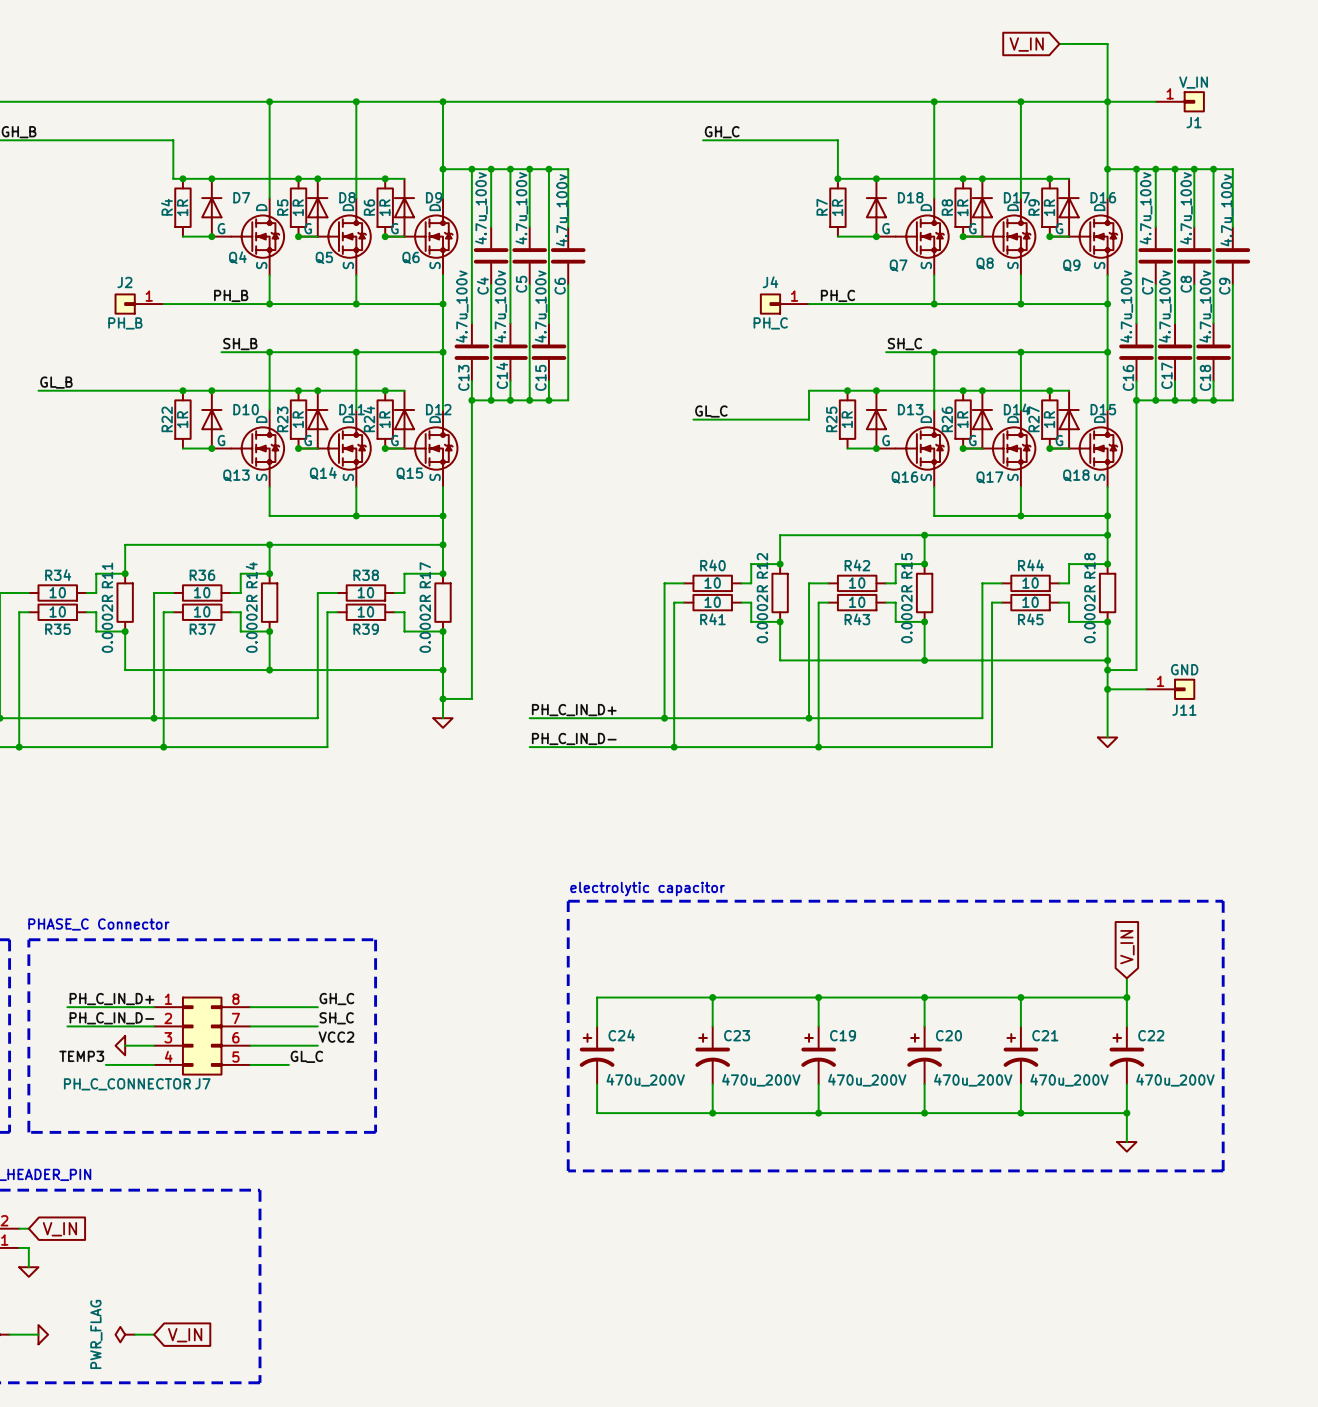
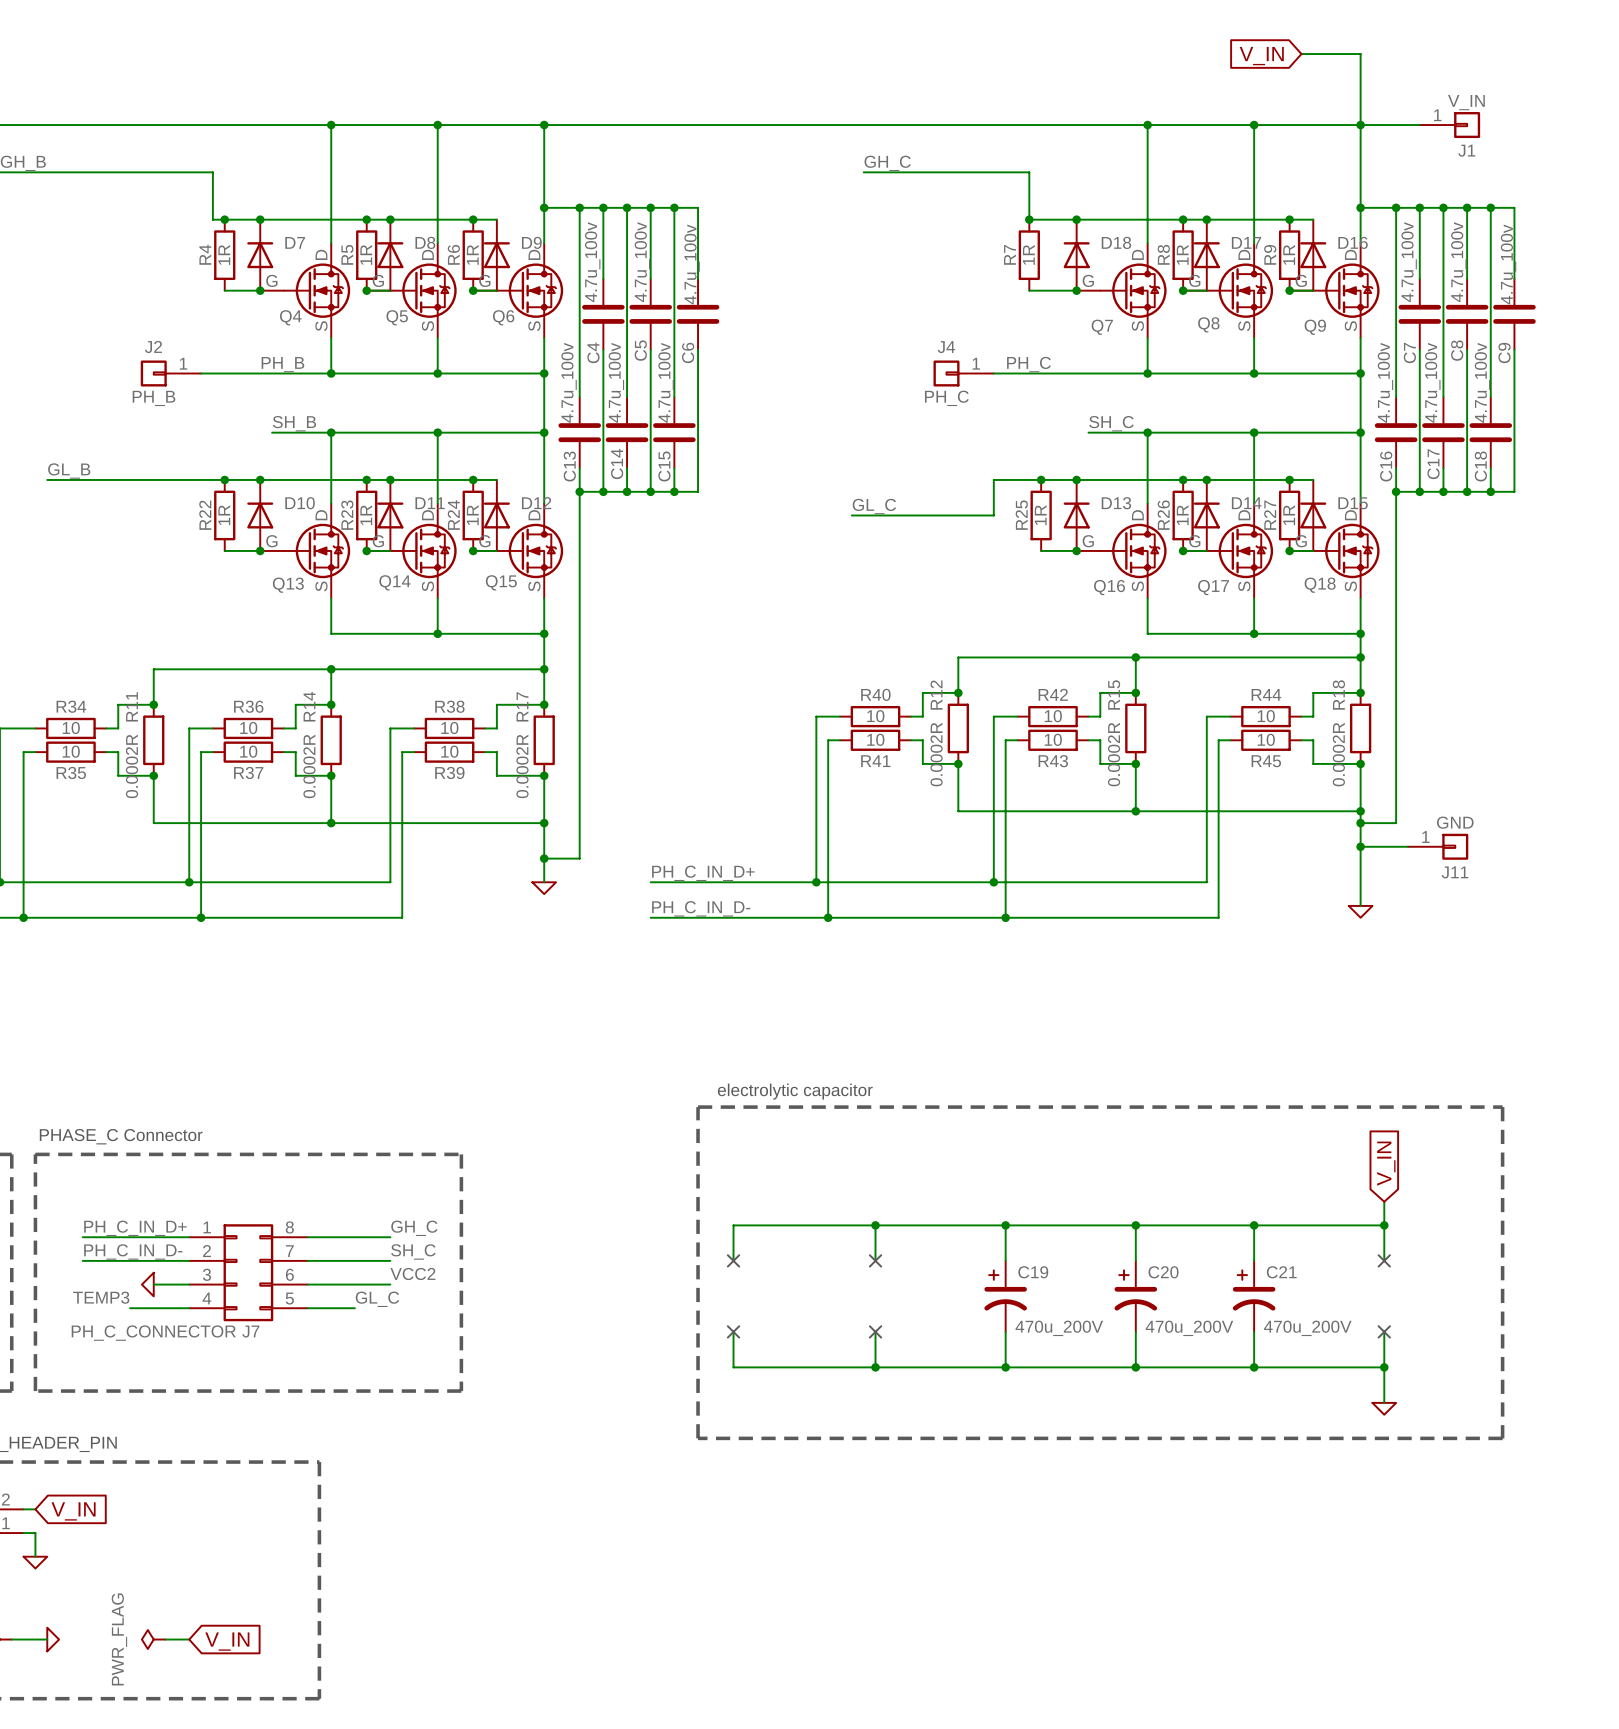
no-connect mark: none -> (733, 1260)
no-connect mark: none -> (875, 1260)
no-connect mark: none -> (1384, 1260)
C24: 470u_200V (597, 1055) -> none
C23: 470u_200V (712, 1055) -> none
C22: 470u_200V (1126, 1055) -> none
no-connect mark: none -> (733, 1331)
no-connect mark: none -> (875, 1331)
no-connect mark: none -> (1384, 1331)

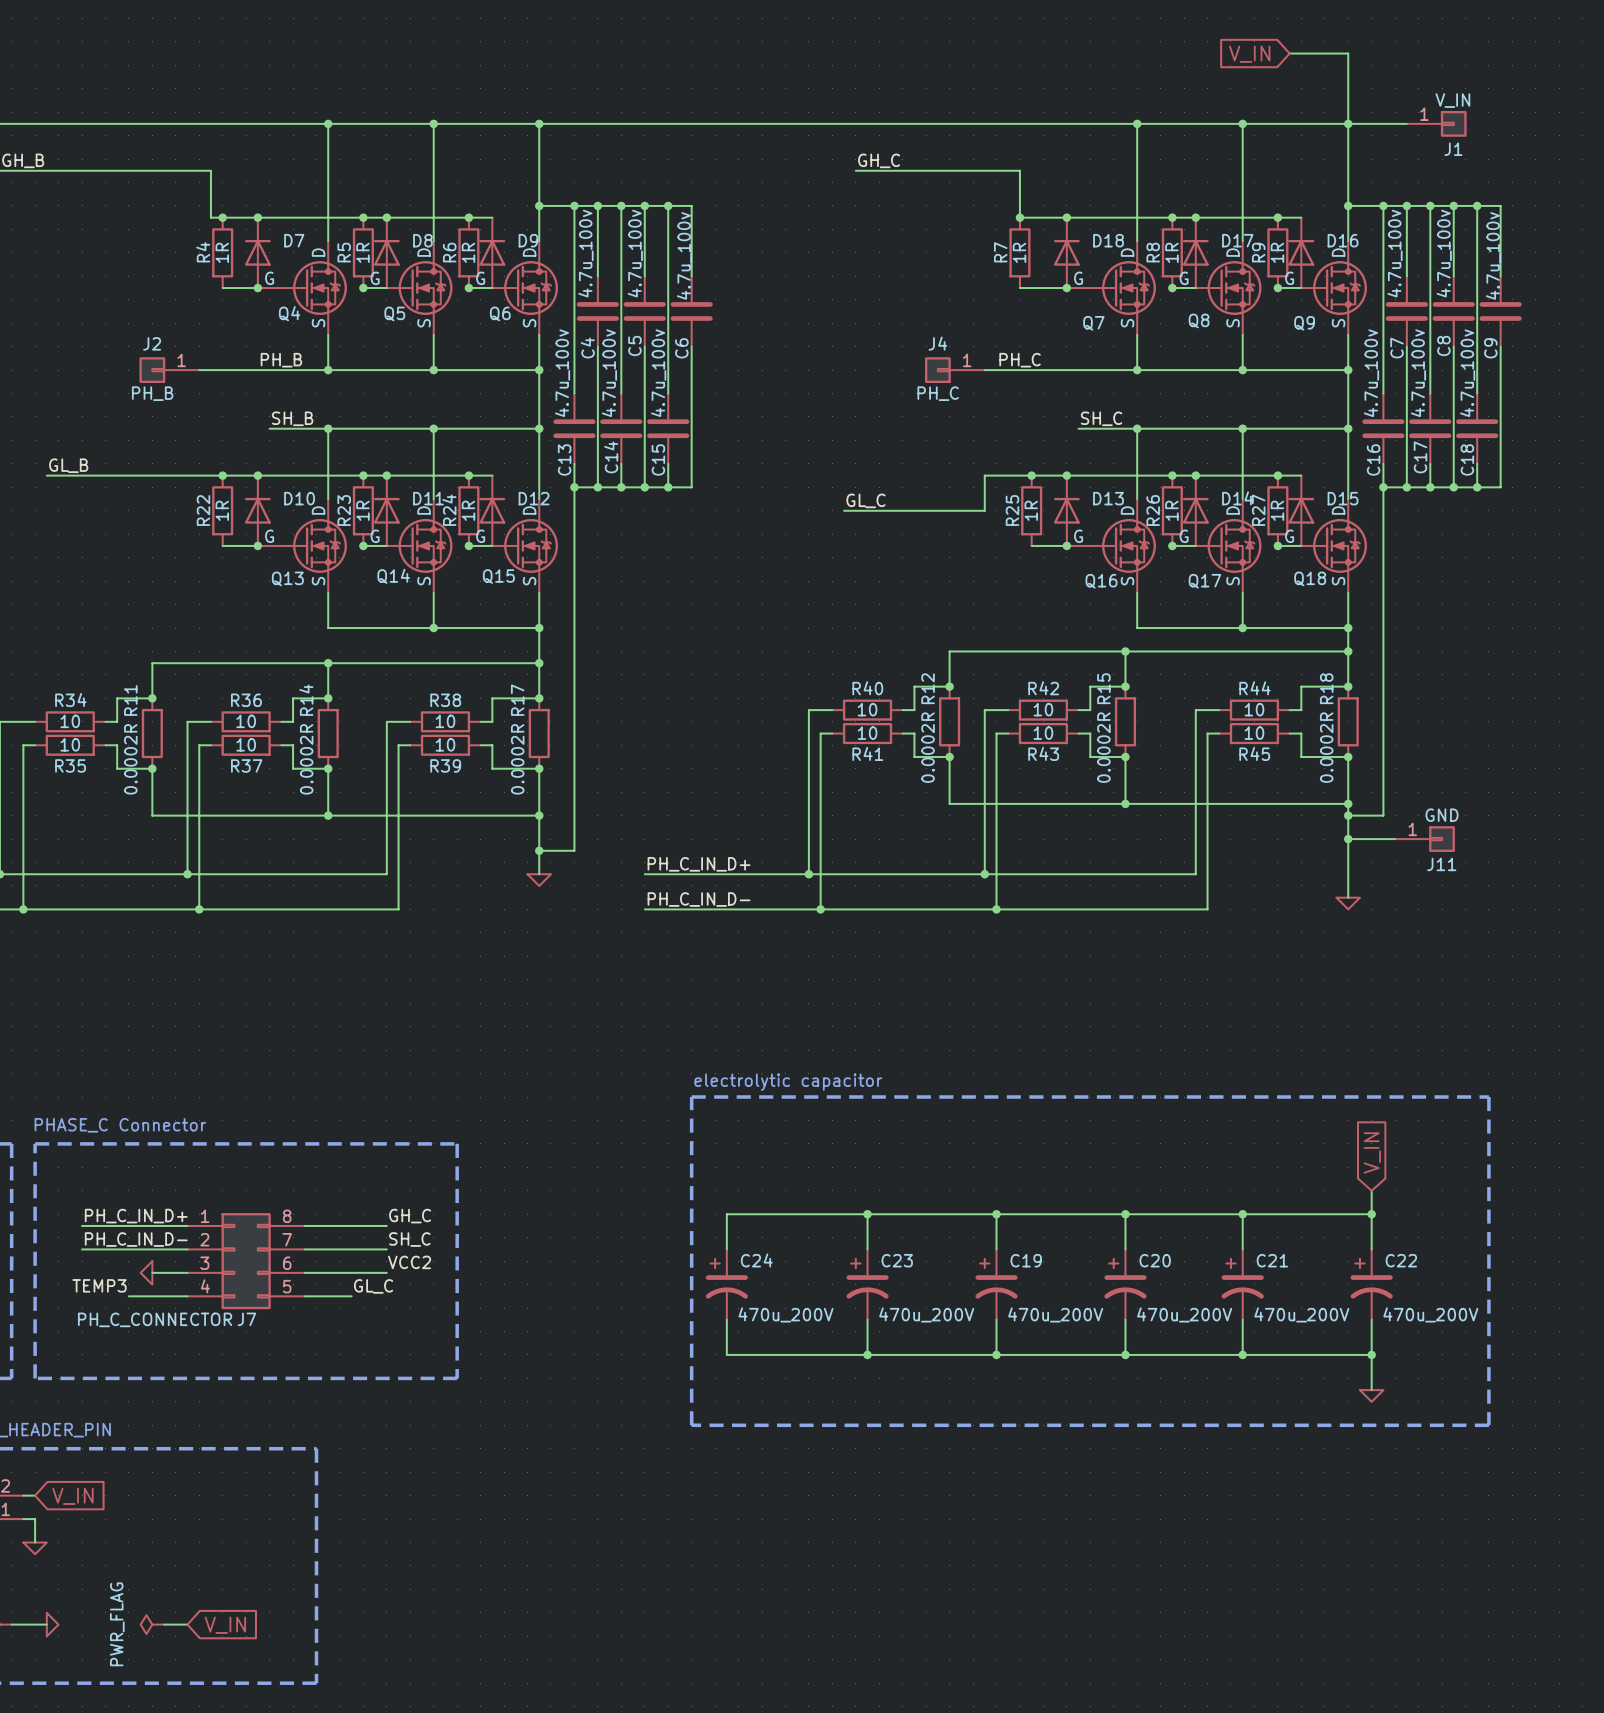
no-connect mark: (733, 1260) -> none
no-connect mark: (875, 1260) -> none
no-connect mark: (1384, 1260) -> none
C24: none -> 470u_200V (726, 1284)
C23: none -> 470u_200V (867, 1284)
C22: none -> 470u_200V (1371, 1284)
no-connect mark: (733, 1331) -> none
no-connect mark: (875, 1331) -> none
no-connect mark: (1384, 1331) -> none

